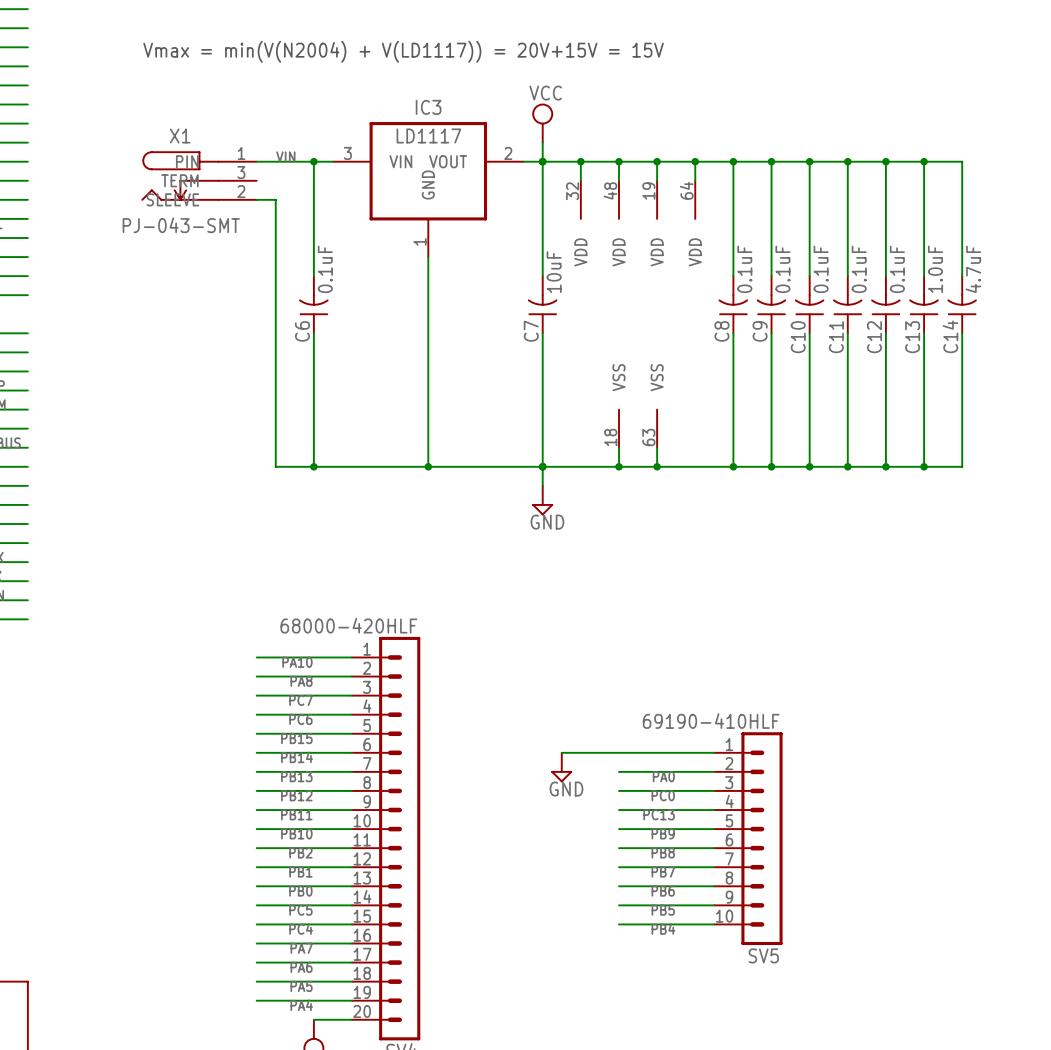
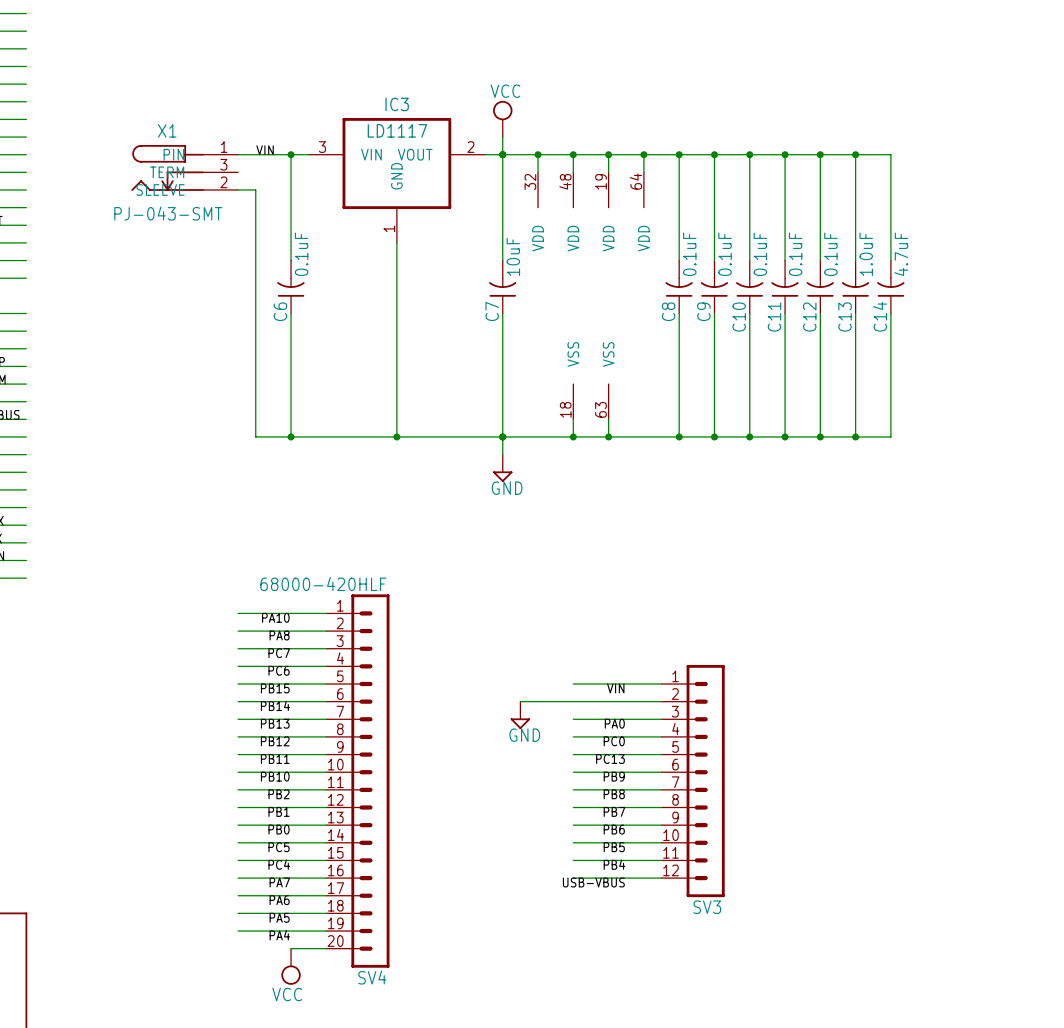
text: Vmax = min(V(N2004) + V(LD1117)) = 20V+15V = 15V (403, 51) -> none
wire: none -> (573, 684) (661, 684)
label: none -> VIN (615, 688)
SV5: 69190-410HLF (748, 838) -> none
SV3: none -> (693, 781)
wire: none -> (573, 878) (661, 878)
label: none -> USB-VBUS (593, 882)

